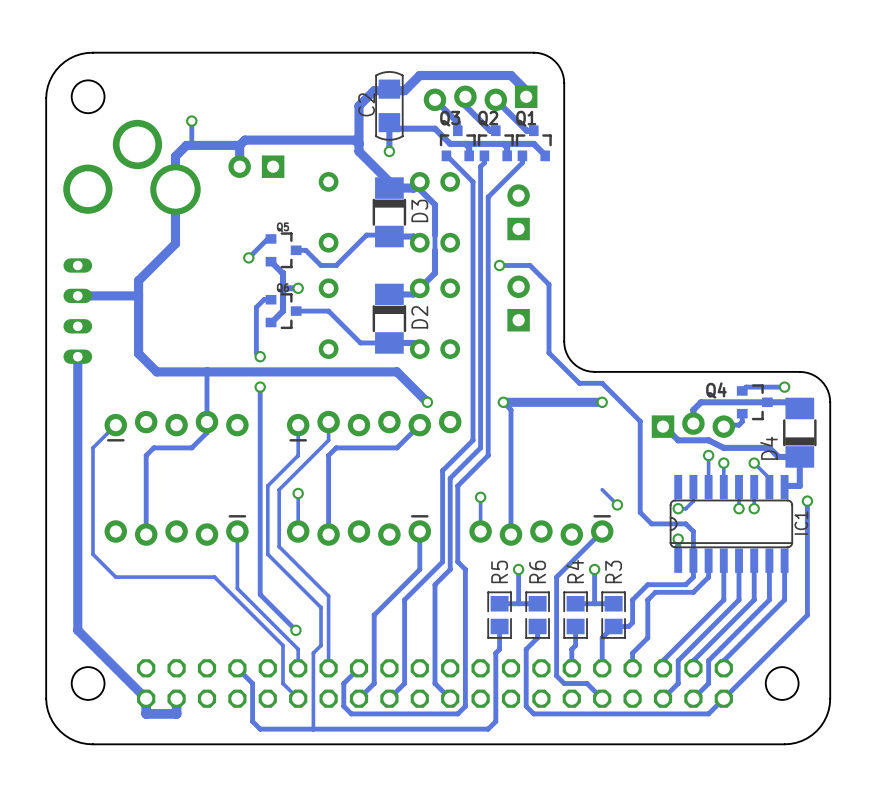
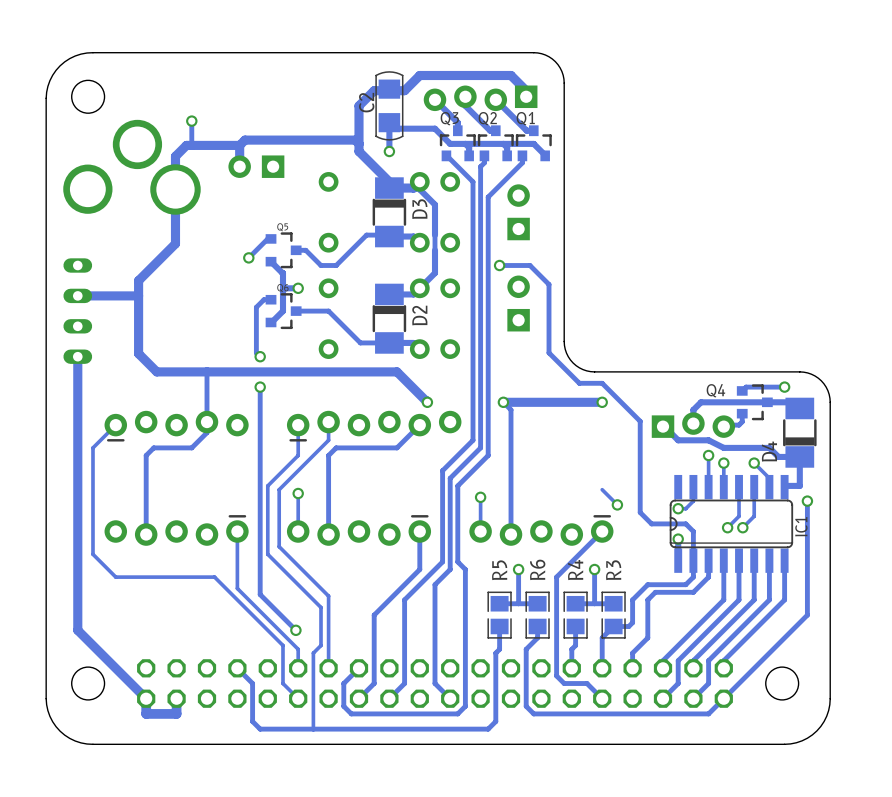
track: none -> (739, 508) (739, 516) (727, 527)
via: (739, 508) -> none
track: none -> (754, 508) (754, 516) (742, 527)
via: (754, 508) -> none
via: none -> (727, 527)
via: none -> (742, 527)

